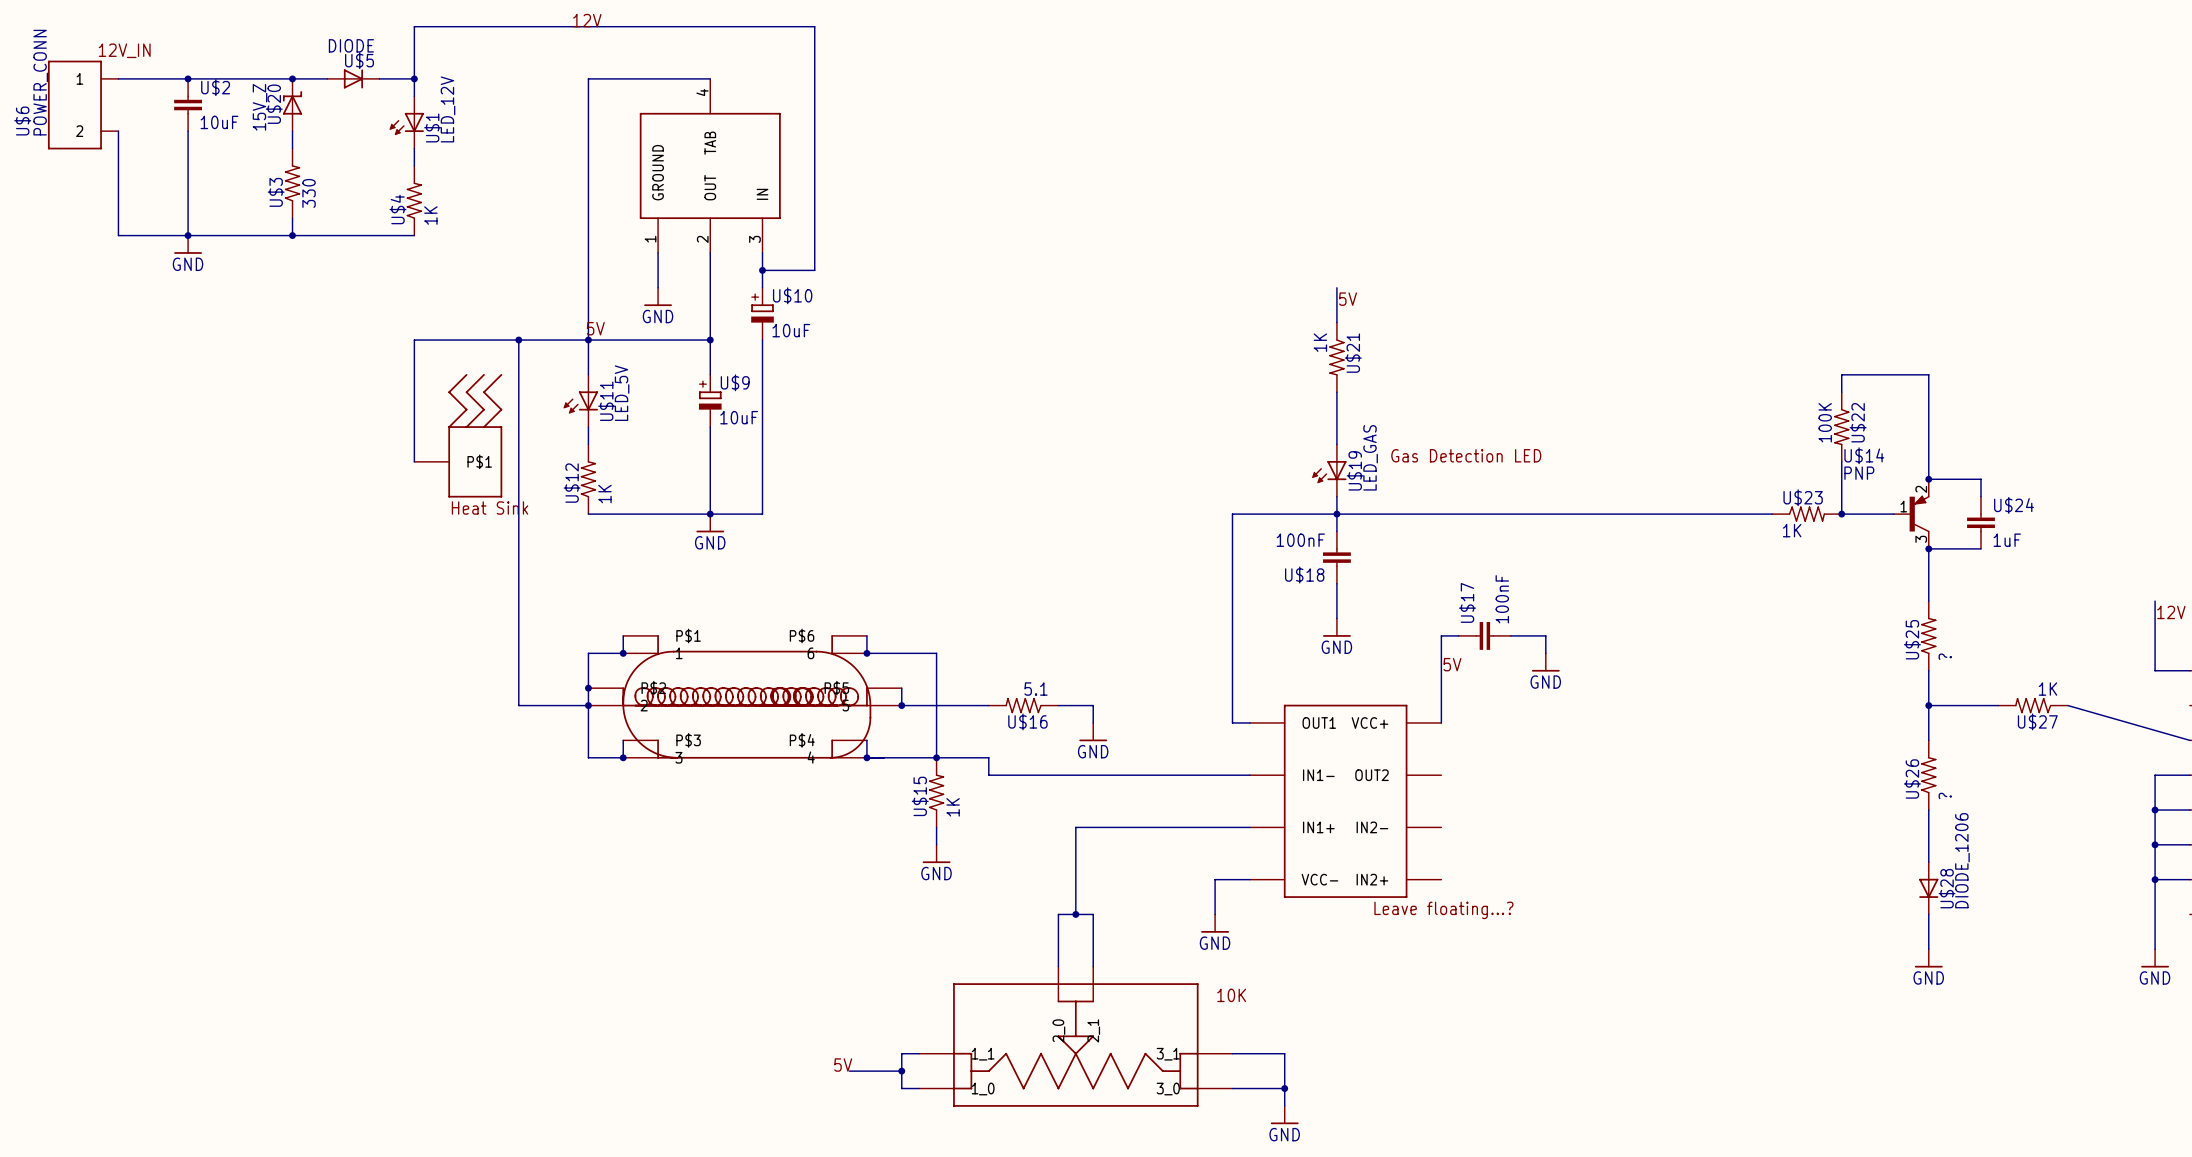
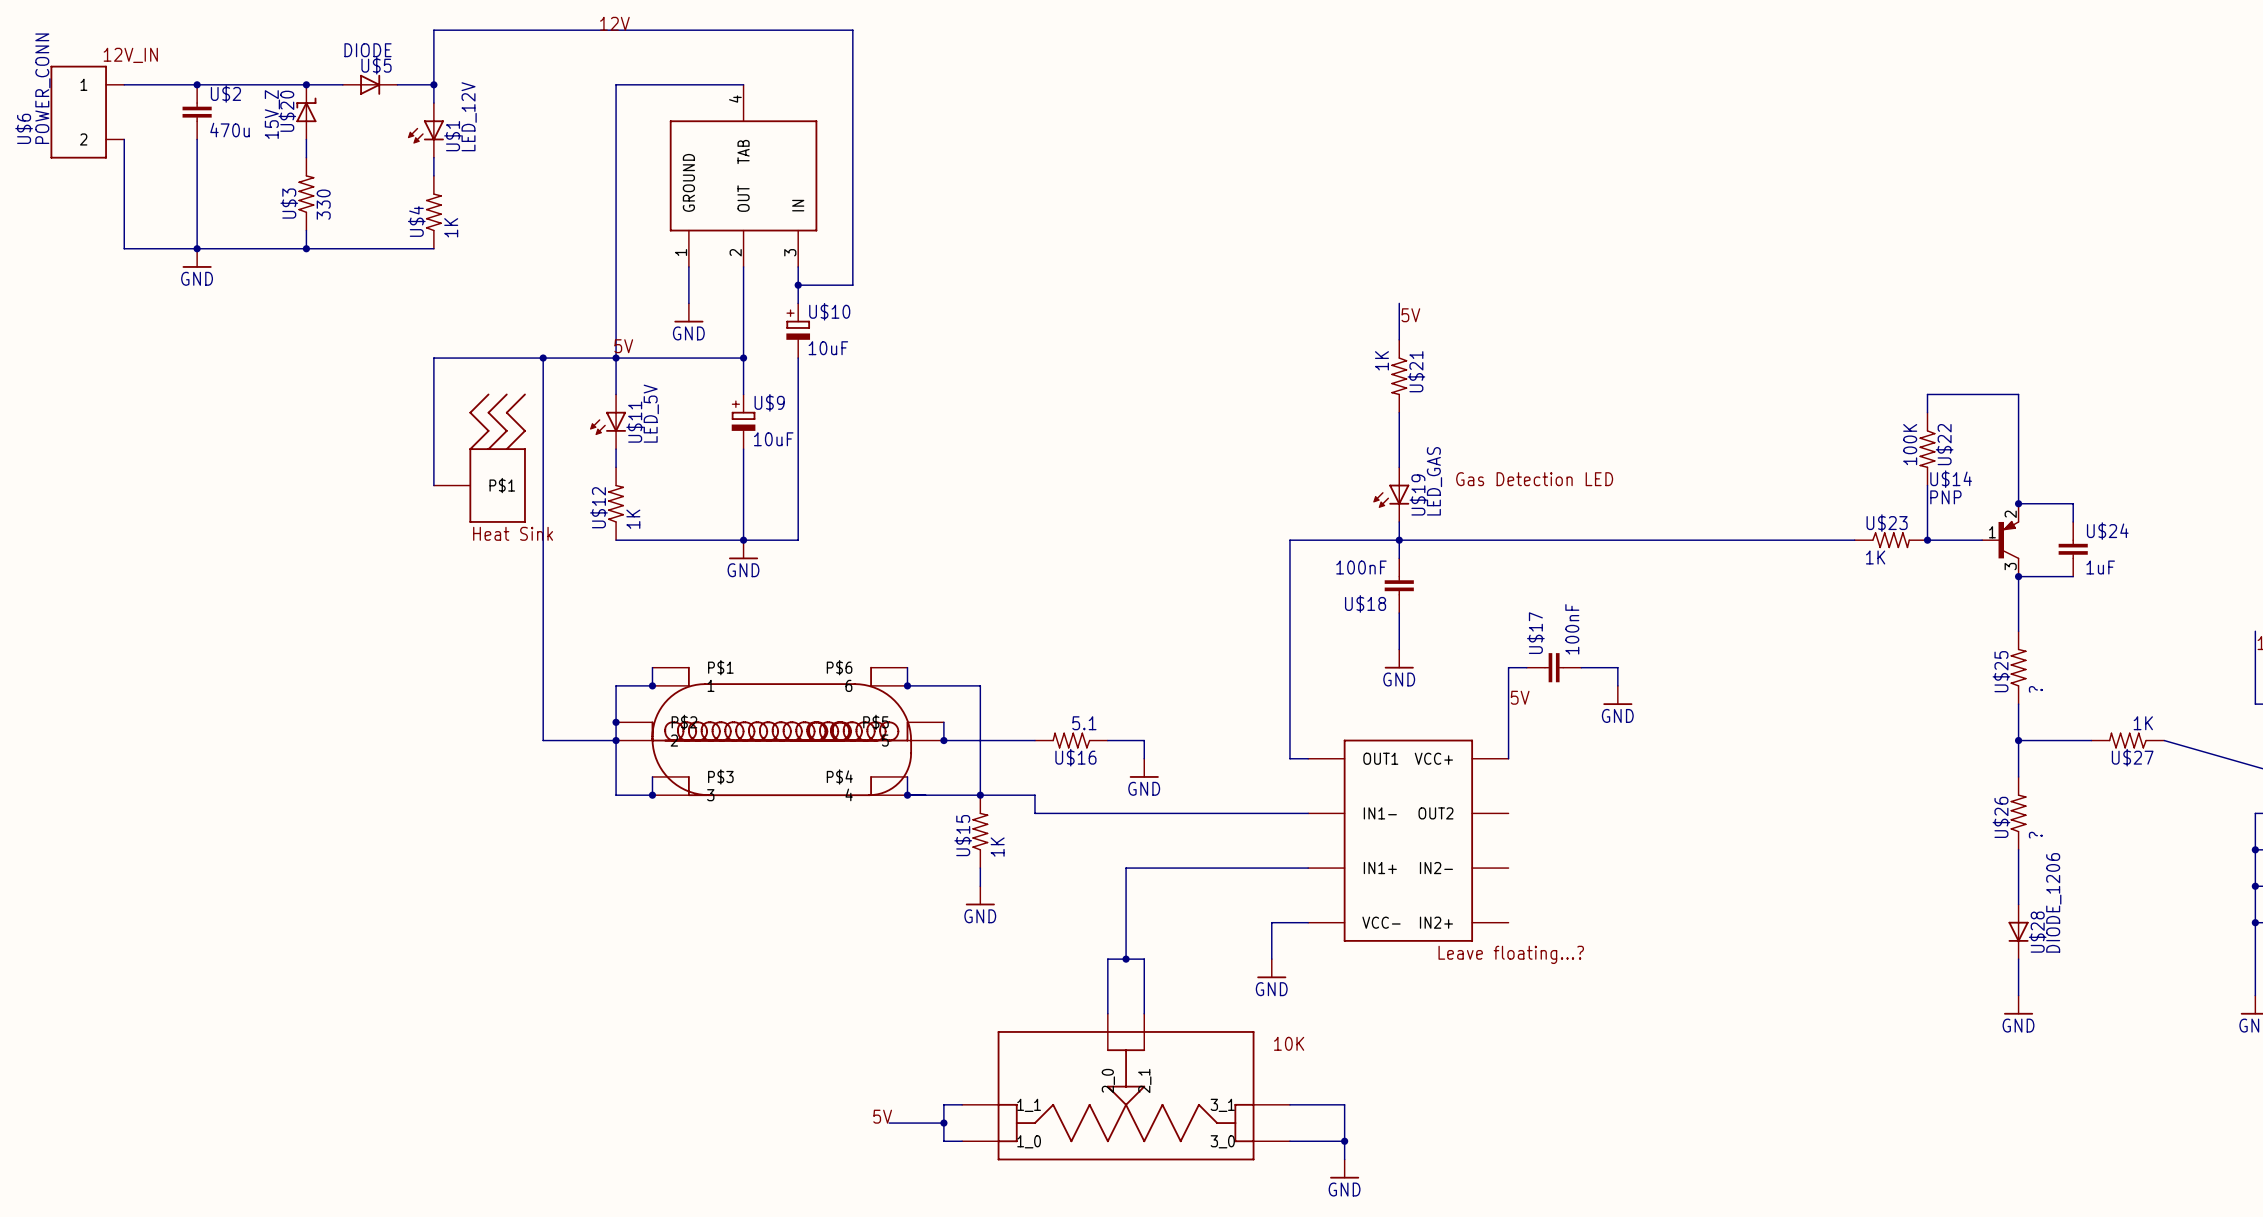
U$2 value: 10uF (219, 122) -> 470u (230, 130)

